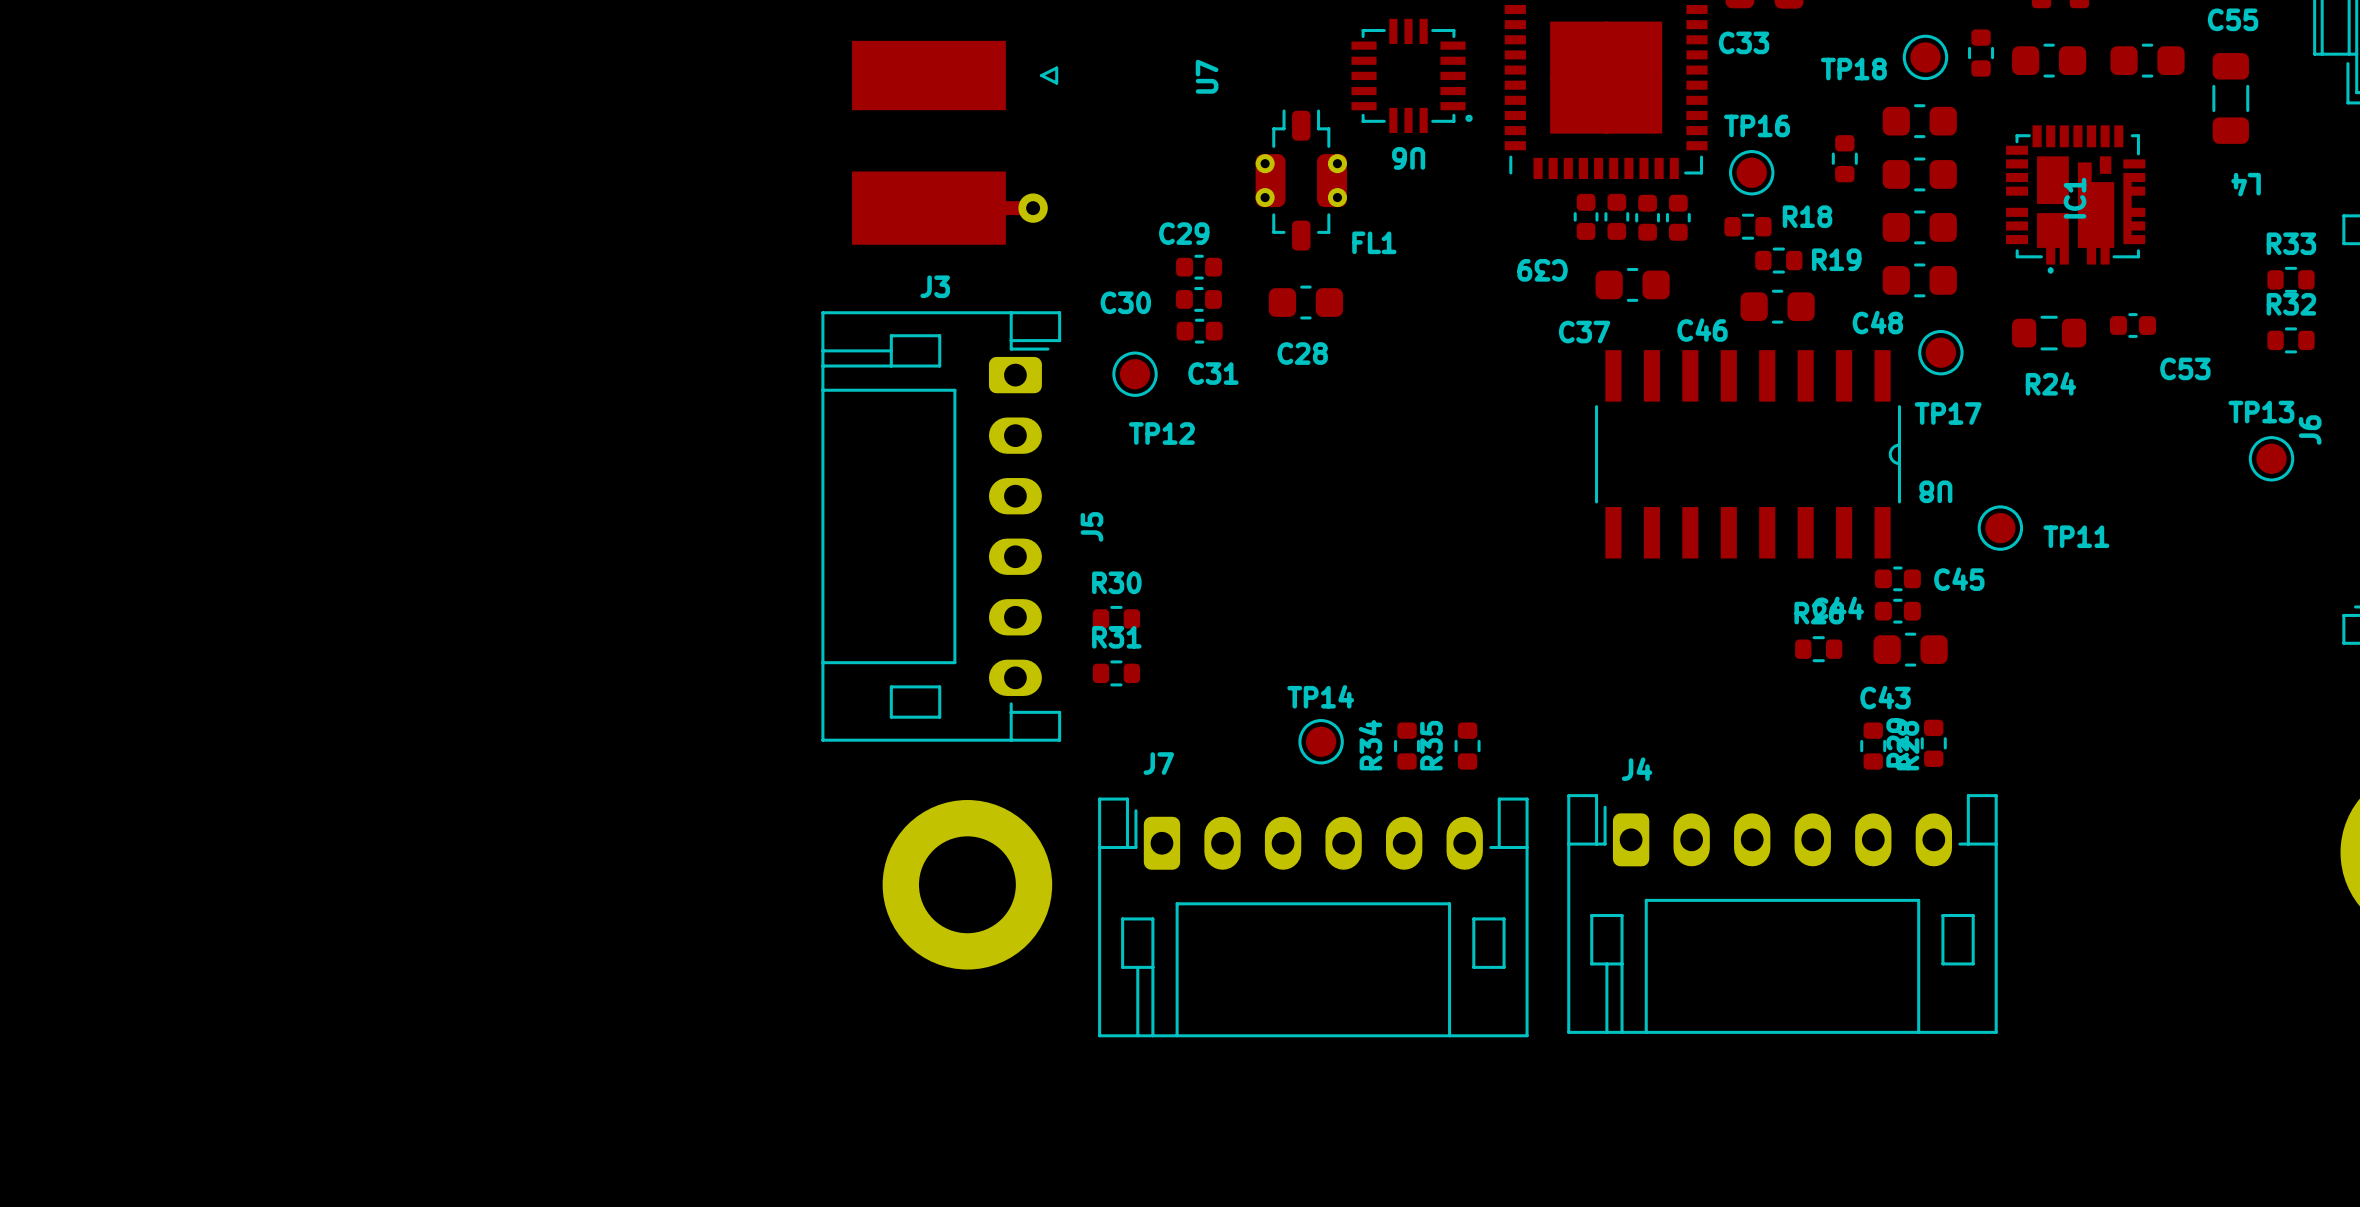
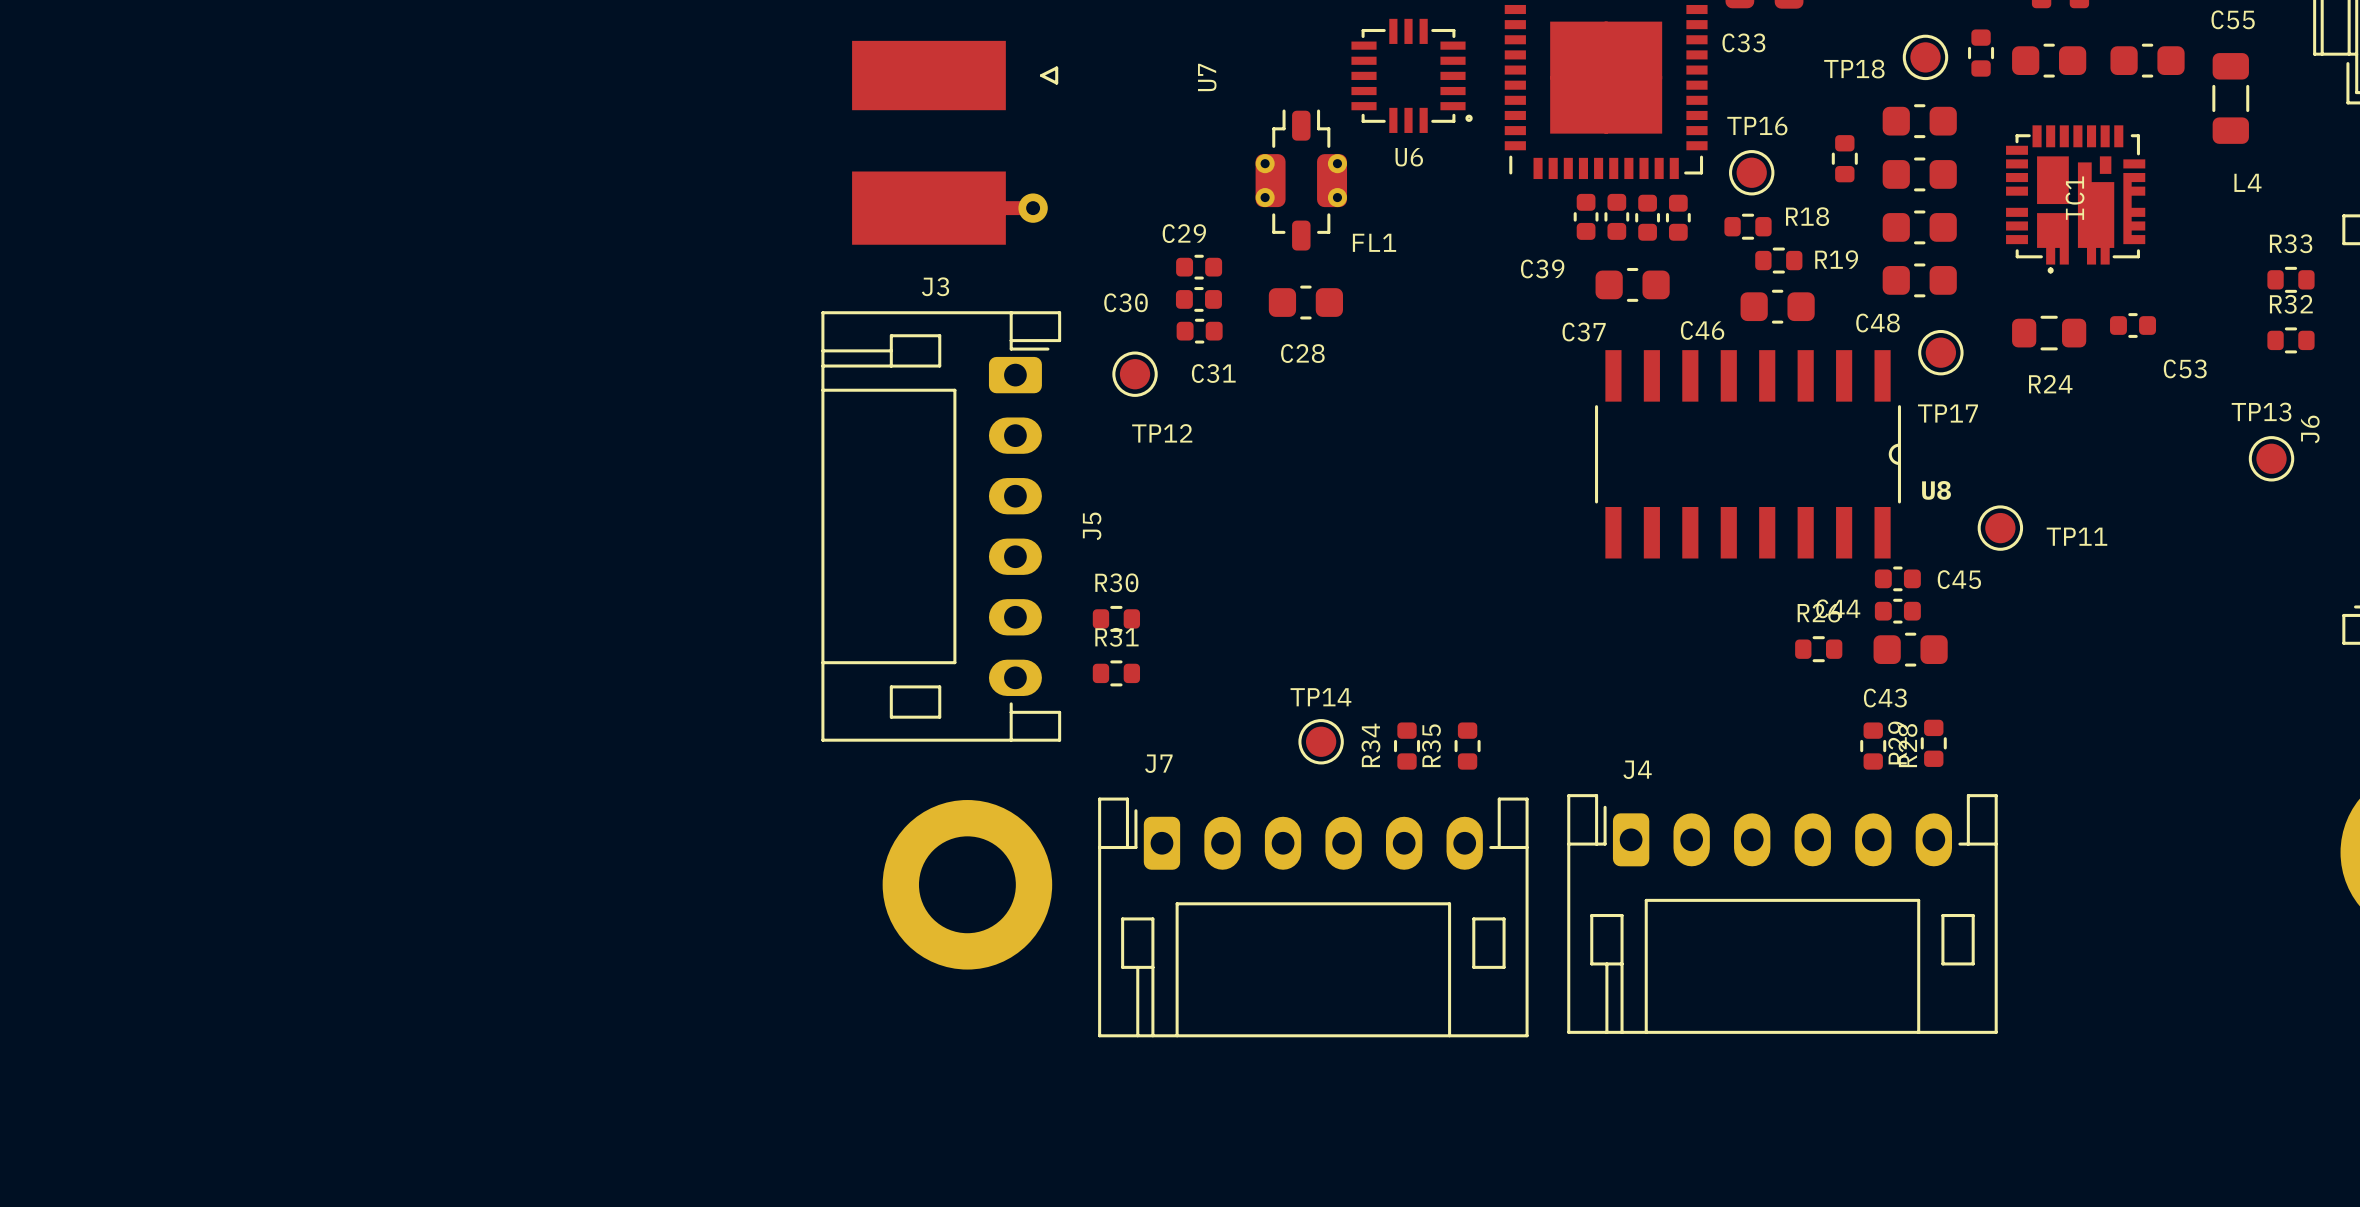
U6 name rotation: 0° (1408, 158) -> 180° (1409, 157)
L4 name rotation: 0° (2246, 184) -> 180° (2247, 182)
C39 name rotation: 0° (1542, 270) -> 180° (1542, 268)
U8 name rotation: 0° (1935, 491) -> 180° (1936, 490)

